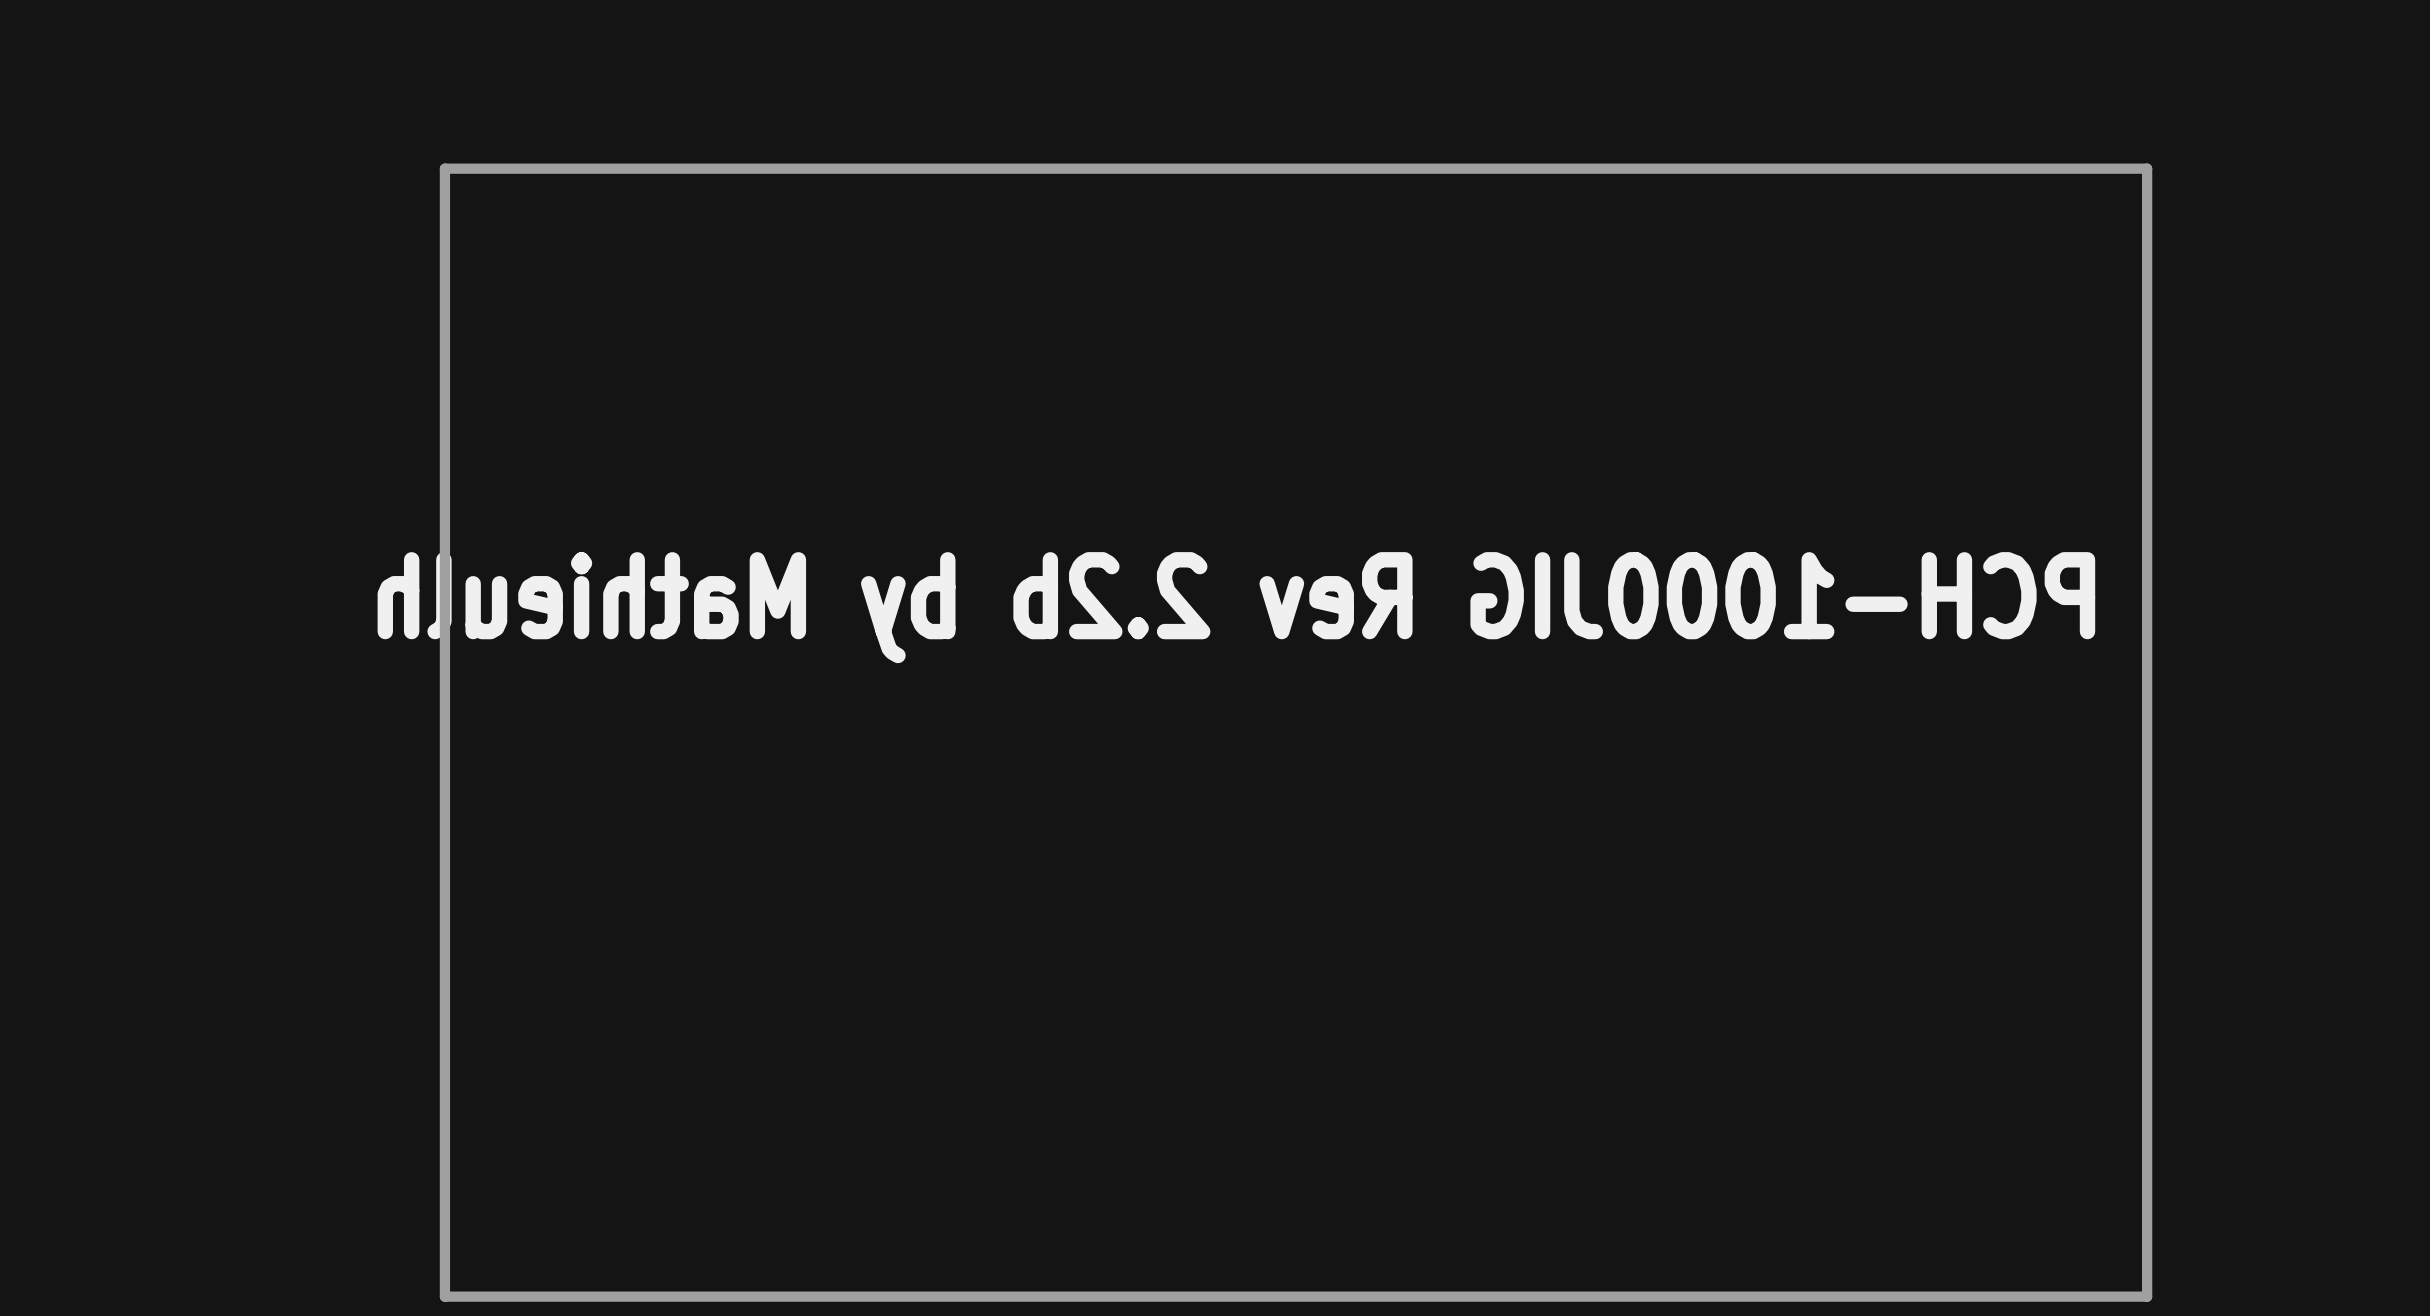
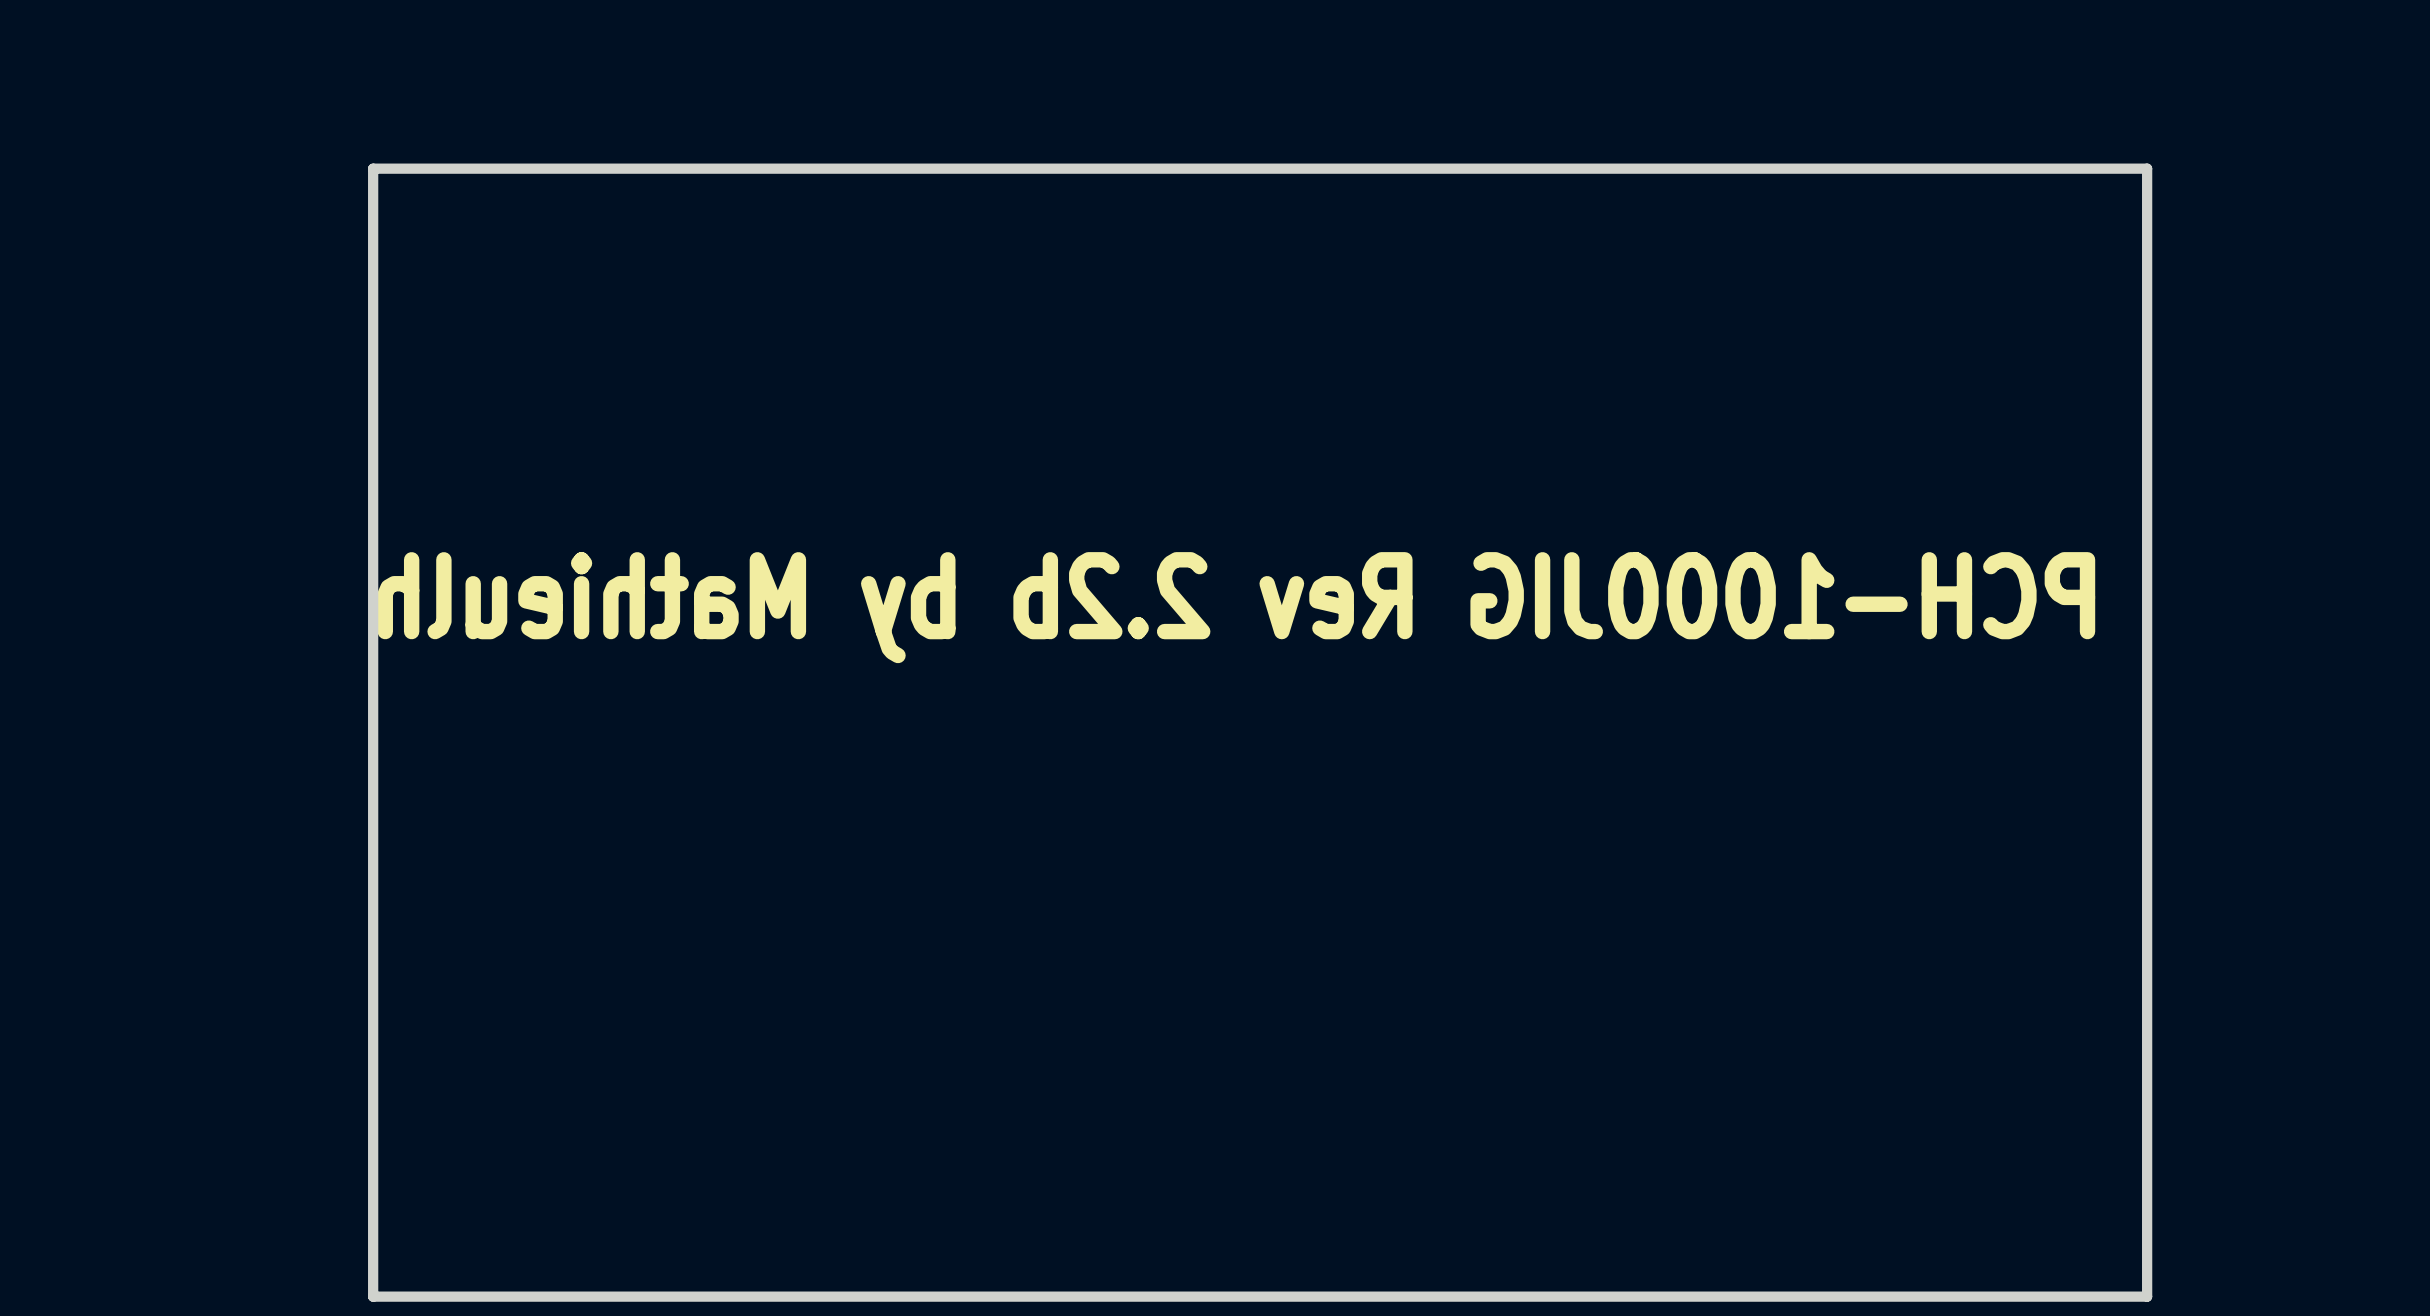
board edge: (444, 168) (444, 1296) -> (444, 168) (373, 168) (373, 1296) (444, 1296)

